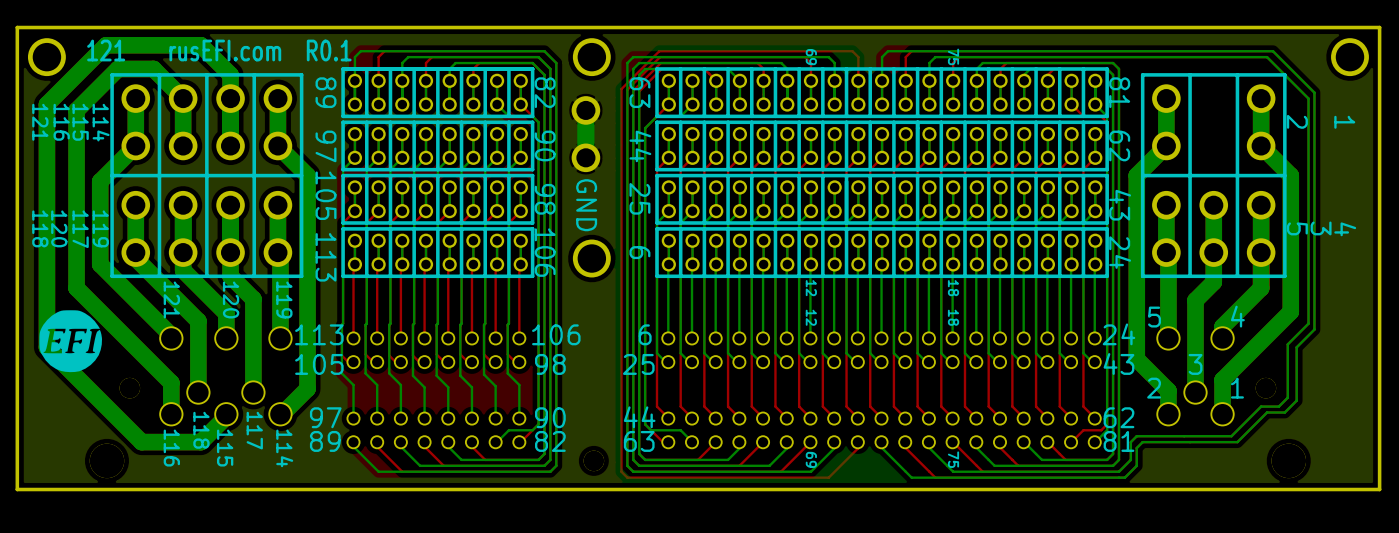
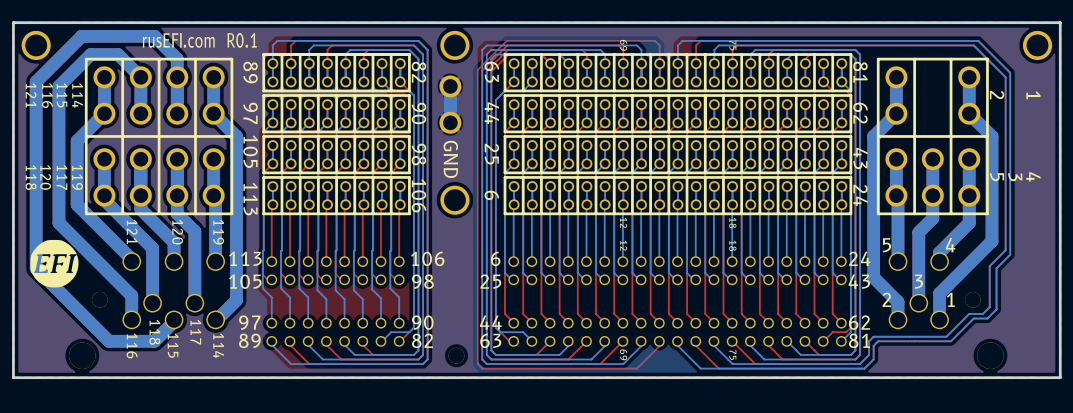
text: 121 (106, 50) -> none

